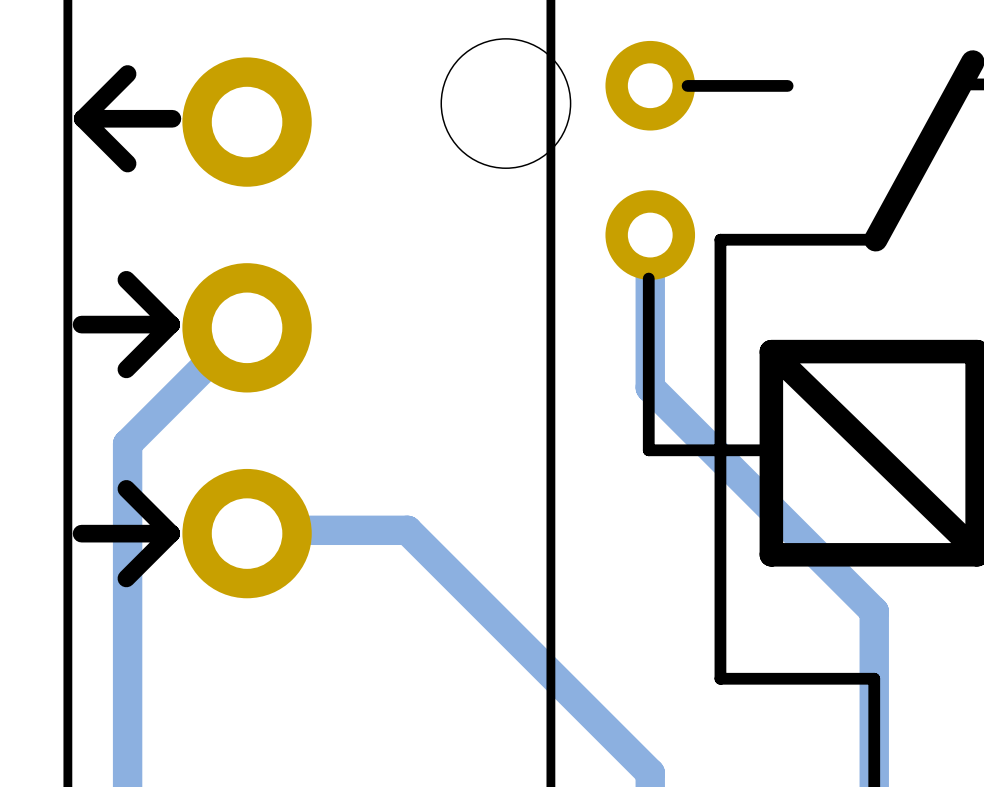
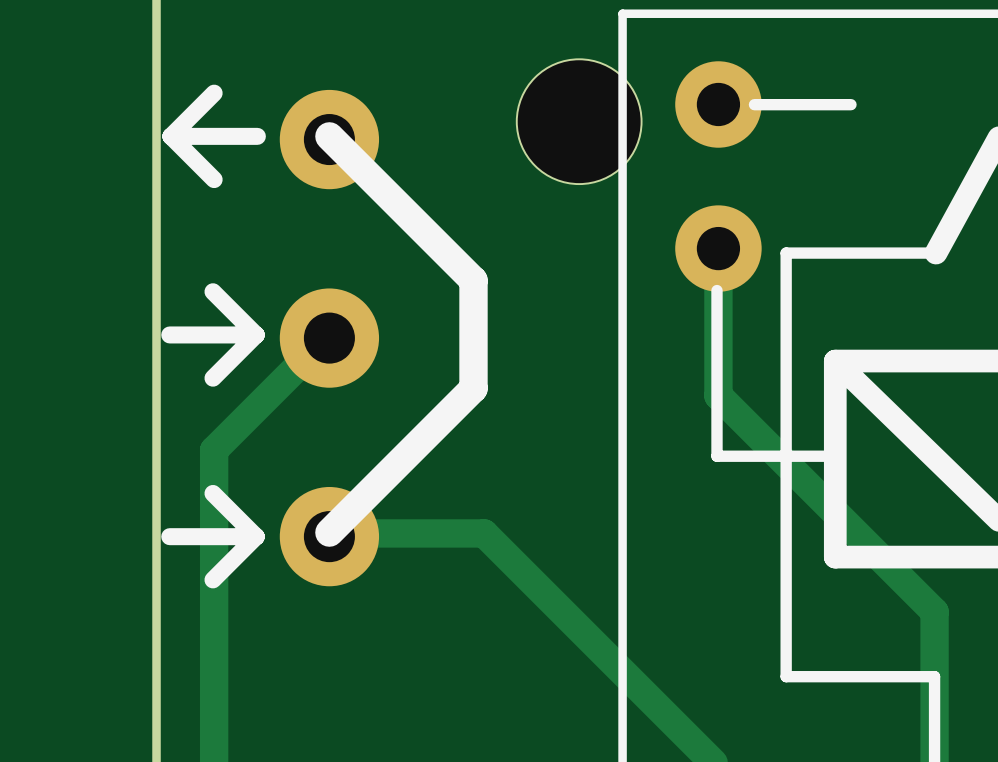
part footprint: [182, 57, 312, 599] -> [279, 89, 380, 587]
line: none -> (329, 136) (473, 280) (473, 388) (329, 532)

